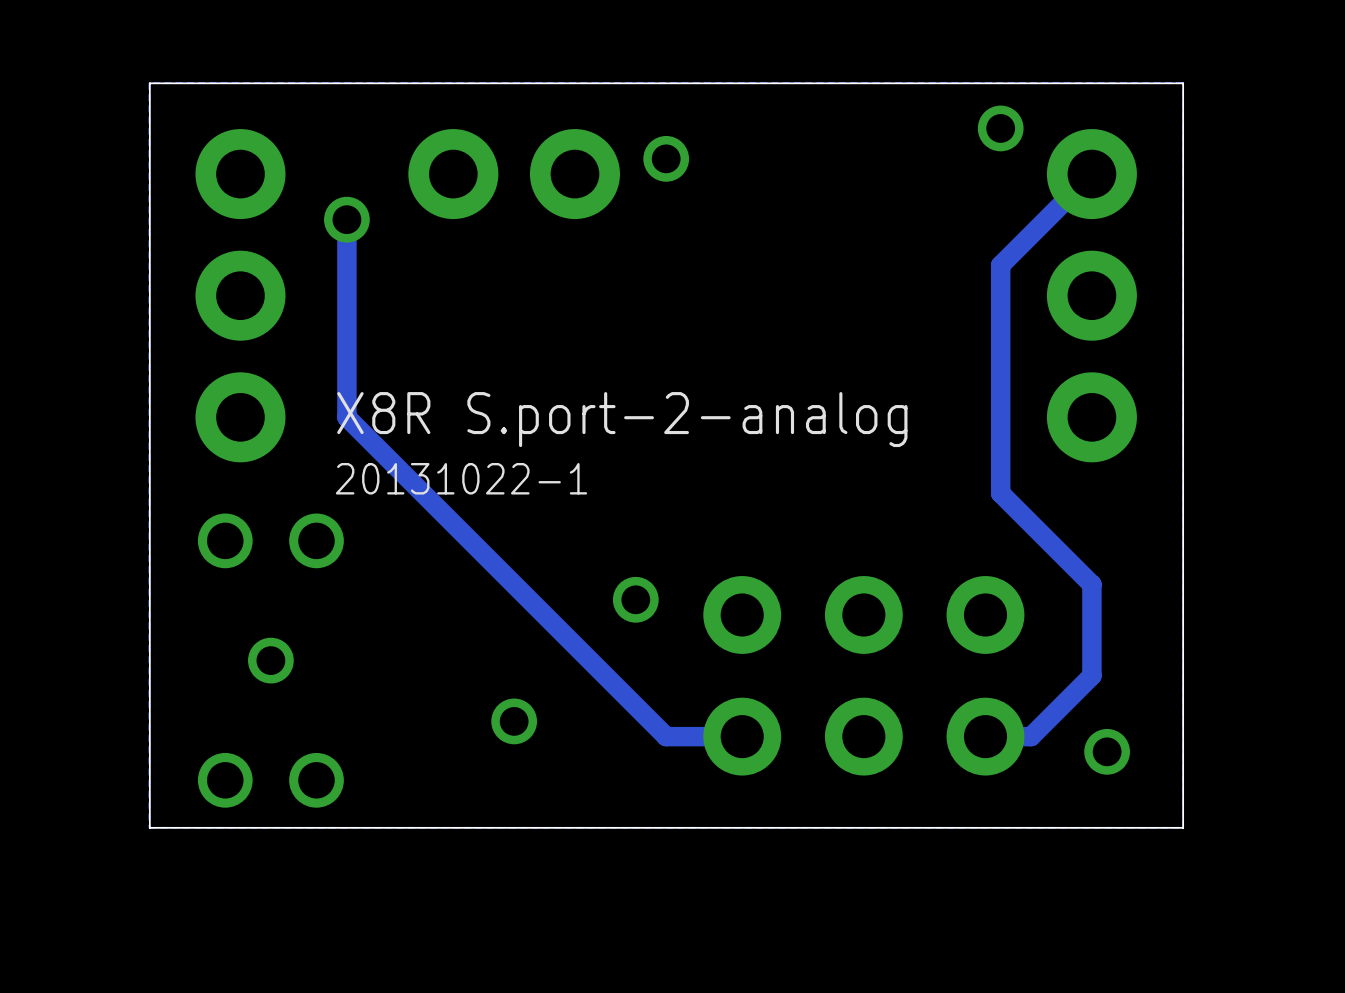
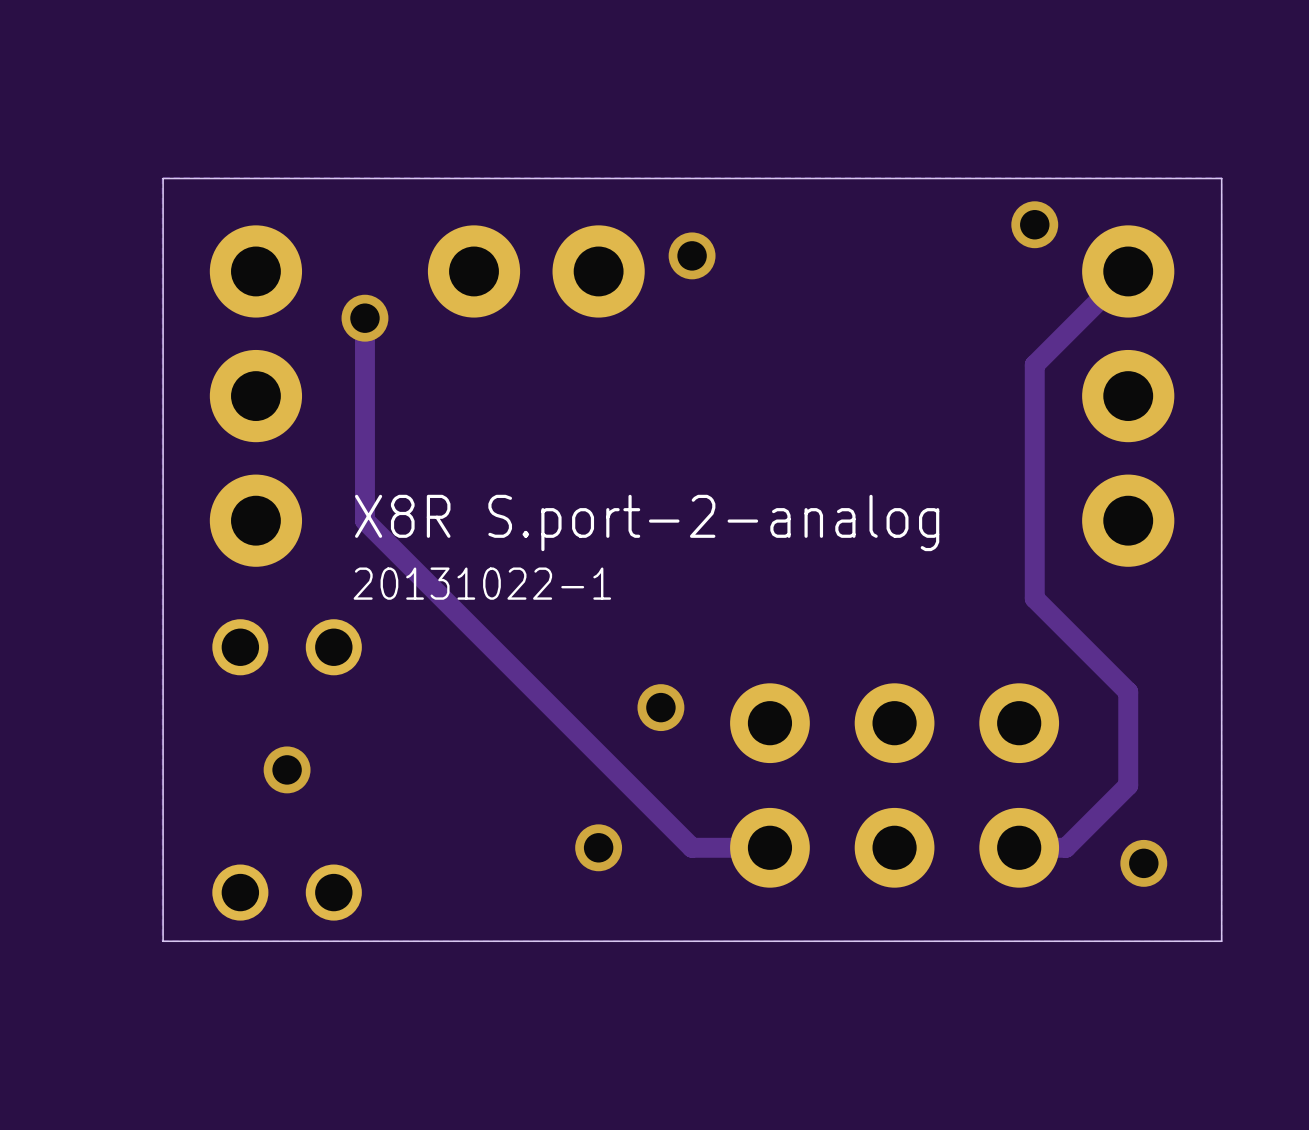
via position: (514, 721) -> (598, 847)

